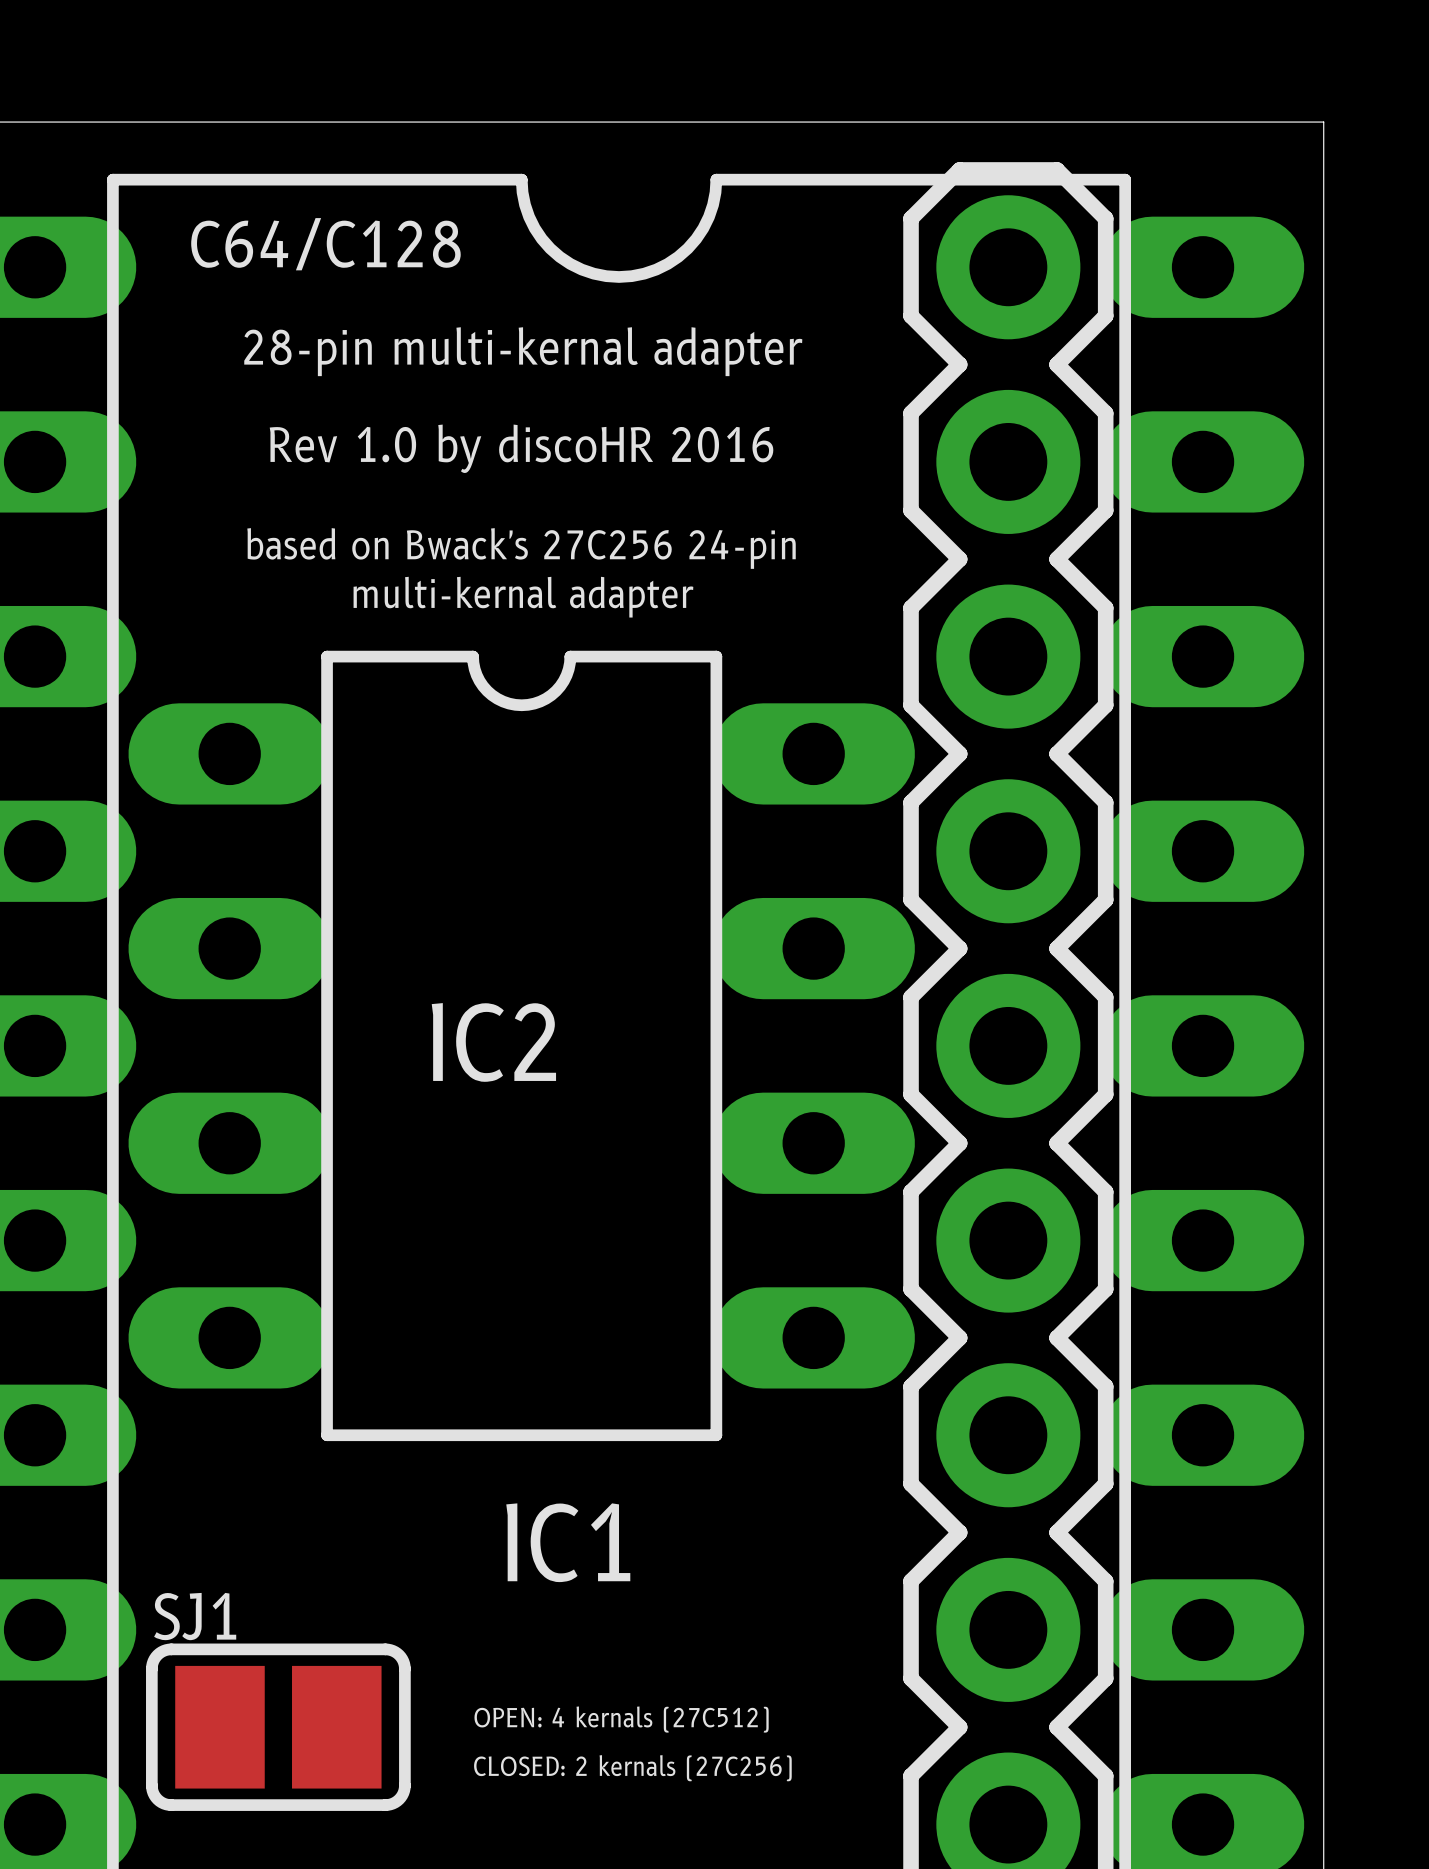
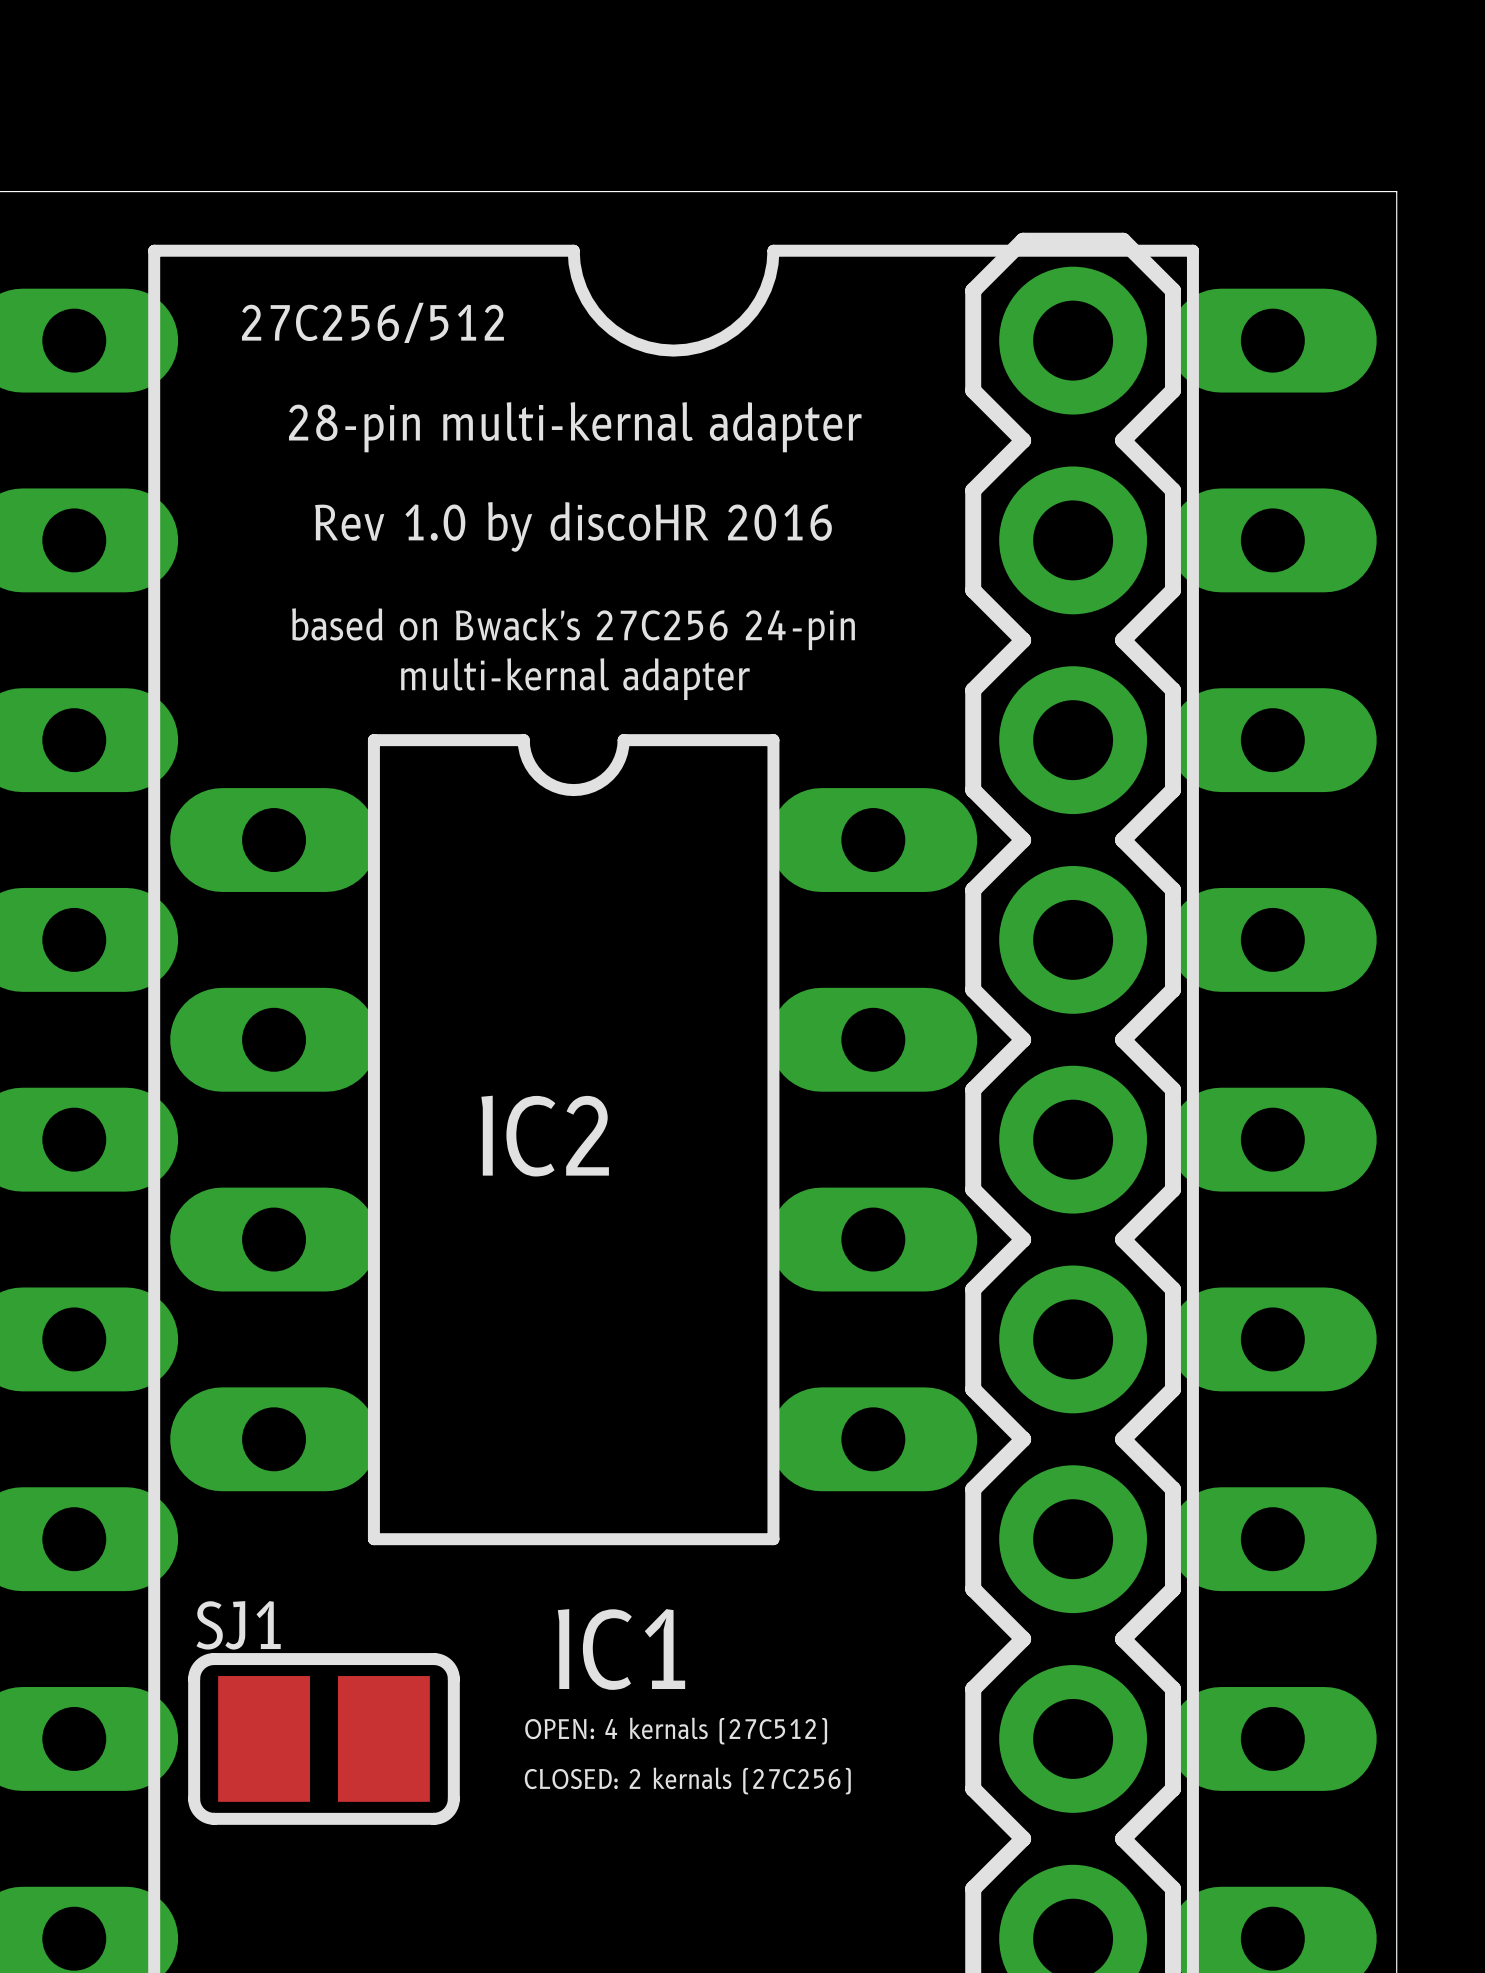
text: C64/C128 (325, 244) -> 27C256/512 (372, 322)
text position: OPEN: 4 kernals (27C512) (621, 1719) -> OPEN: 4 kernals (27C512) (676, 1731)
SJ1 position: (278, 1727) -> (323, 1738)
text position: CLOSED: 2 kernals (27C256) (632, 1768) -> CLOSED: 2 kernals (27C256) (687, 1781)

